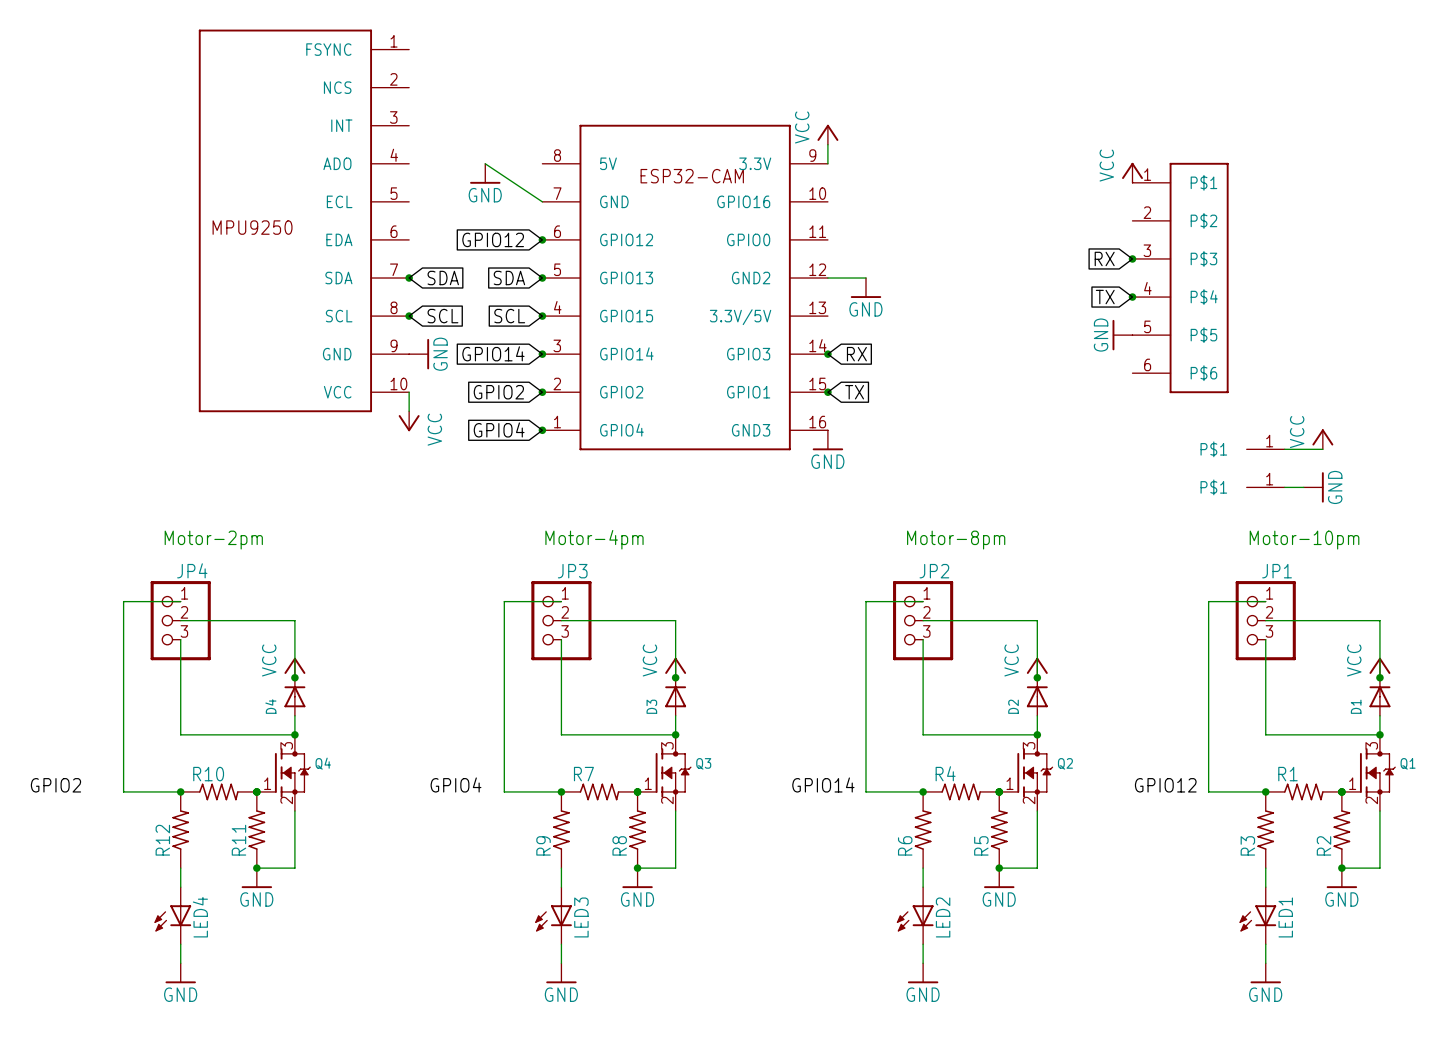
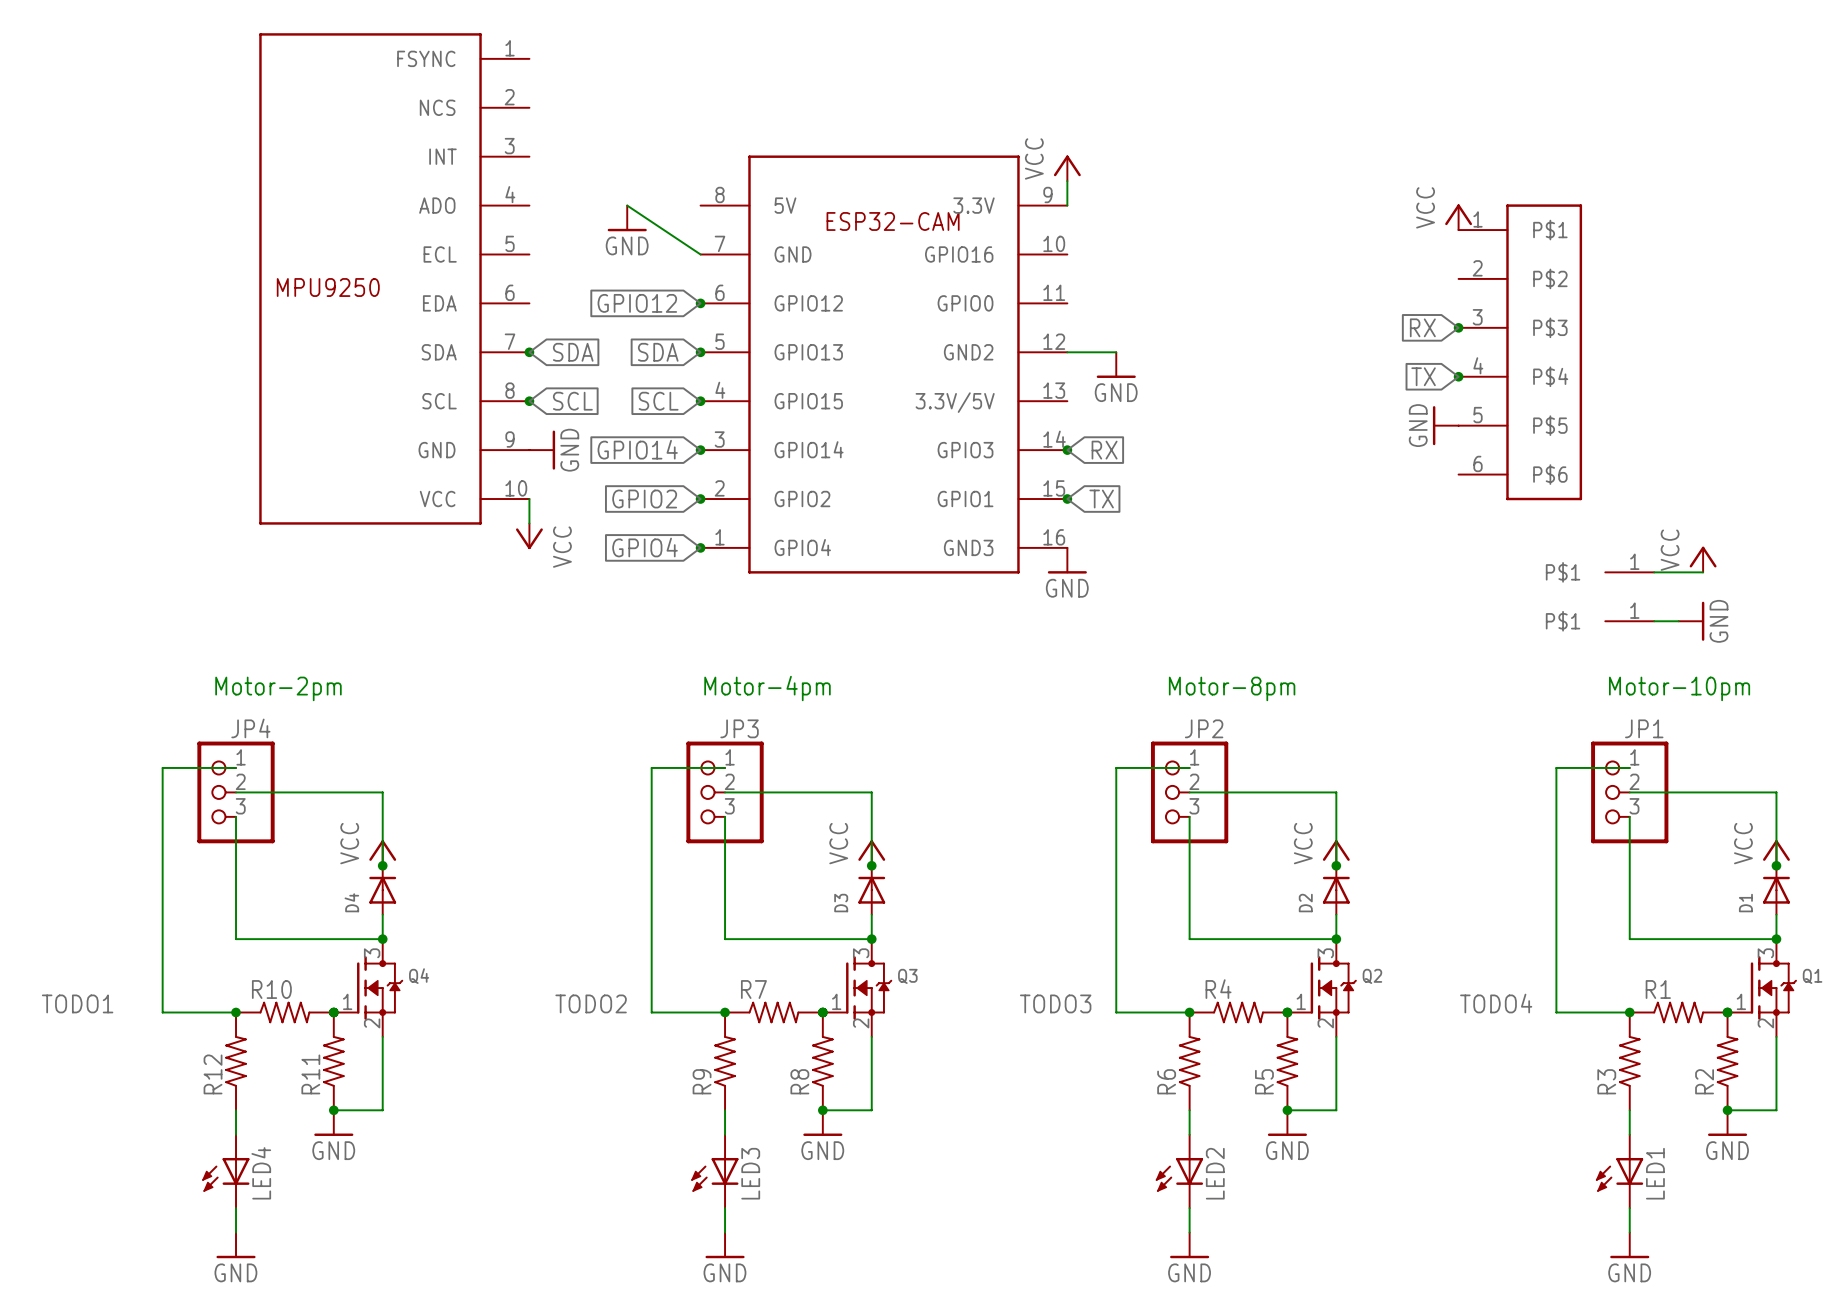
label: GPIO4 (456, 784) -> TODO2 (591, 1003)
label: GPIO14 (823, 784) -> TODO3 (1055, 1003)
label: GPIO2 (55, 785) -> TODO1 (77, 1003)
label: GPIO12 (1165, 785) -> TODO4 (1496, 1003)

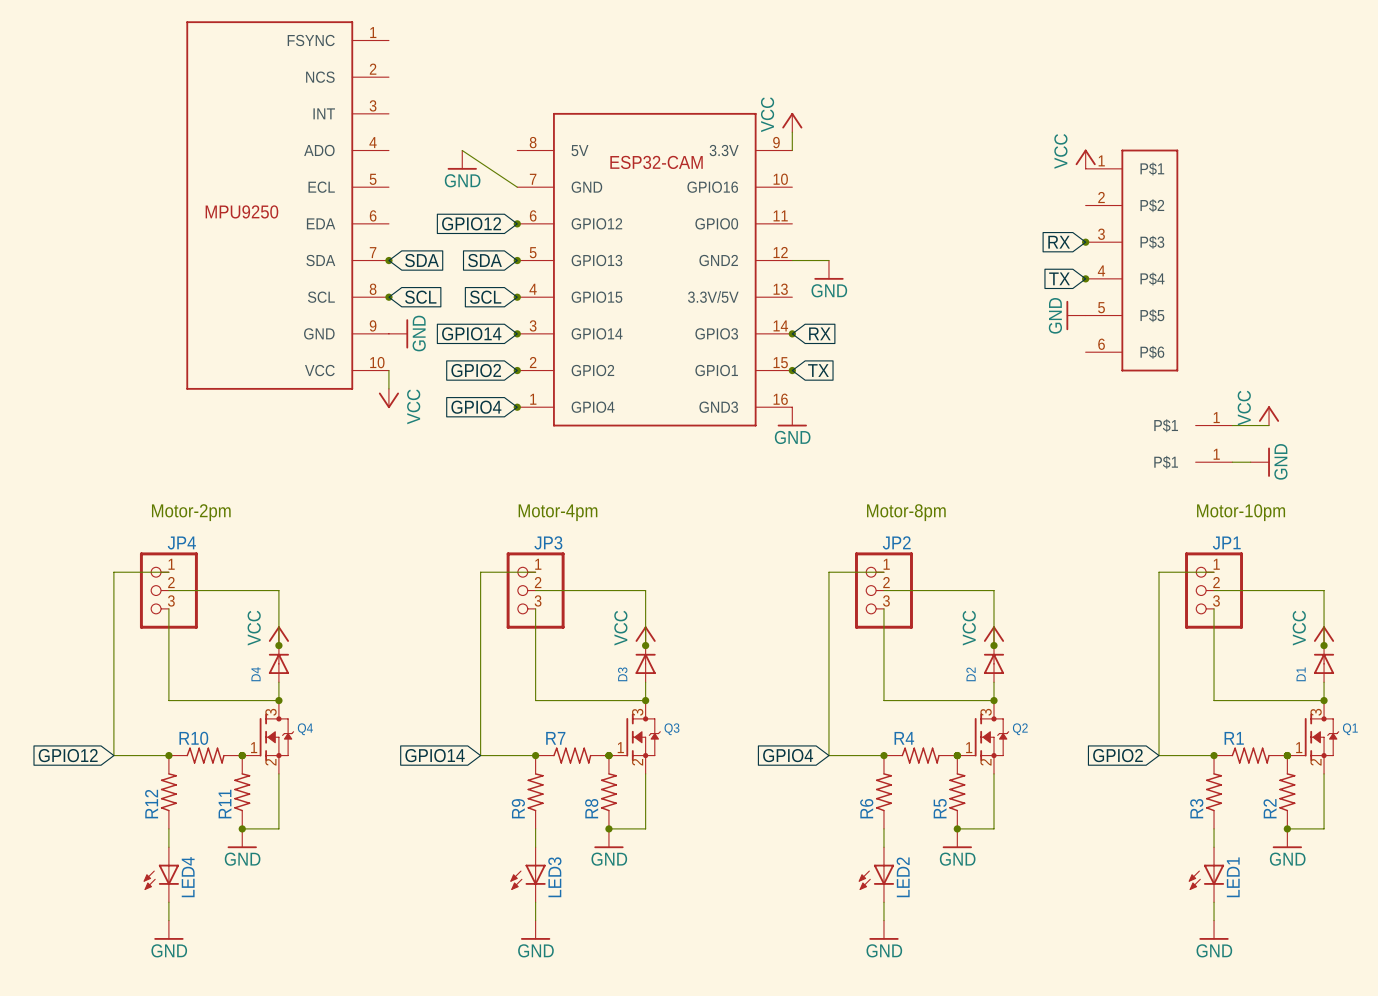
label: TODO1 (77, 1003) -> none
label: TODO2 (591, 1003) -> none
label: TODO3 (1055, 1003) -> none
label: TODO4 (1496, 1003) -> none
global label: none -> GPIO12 (68, 755)
global label: none -> GPIO14 (435, 755)
global label: none -> GPIO4 (788, 755)
global label: none -> GPIO2 (1117, 755)

